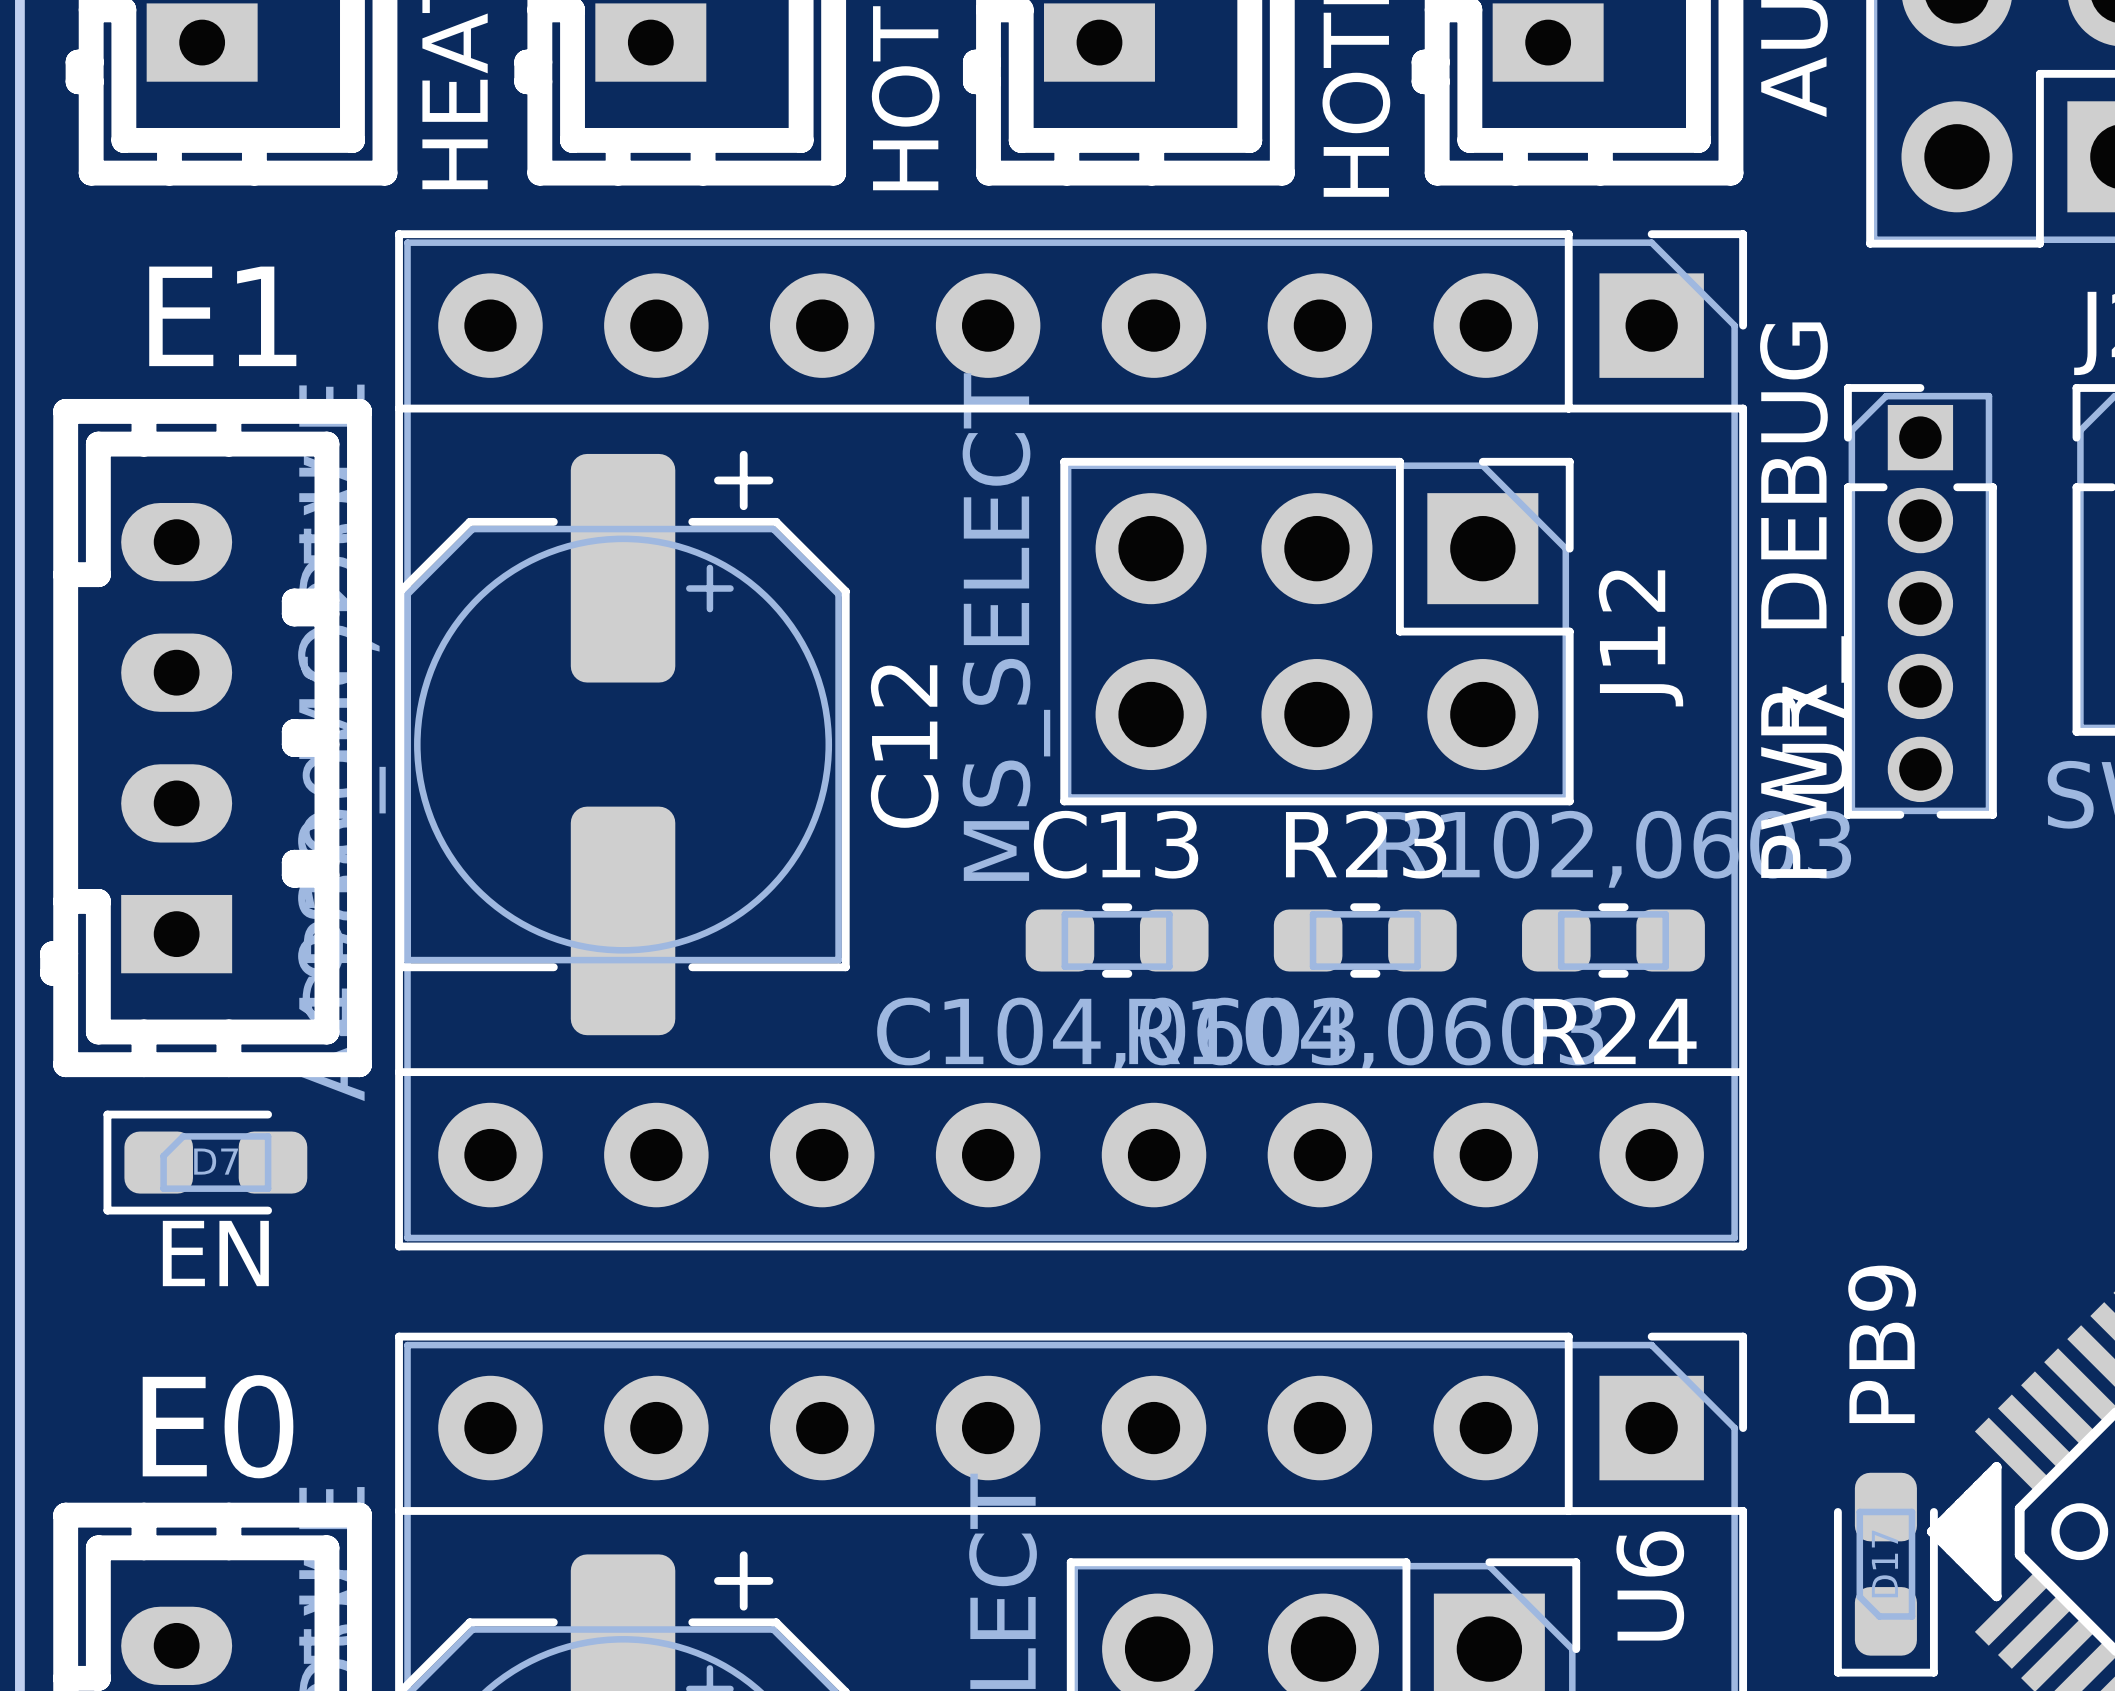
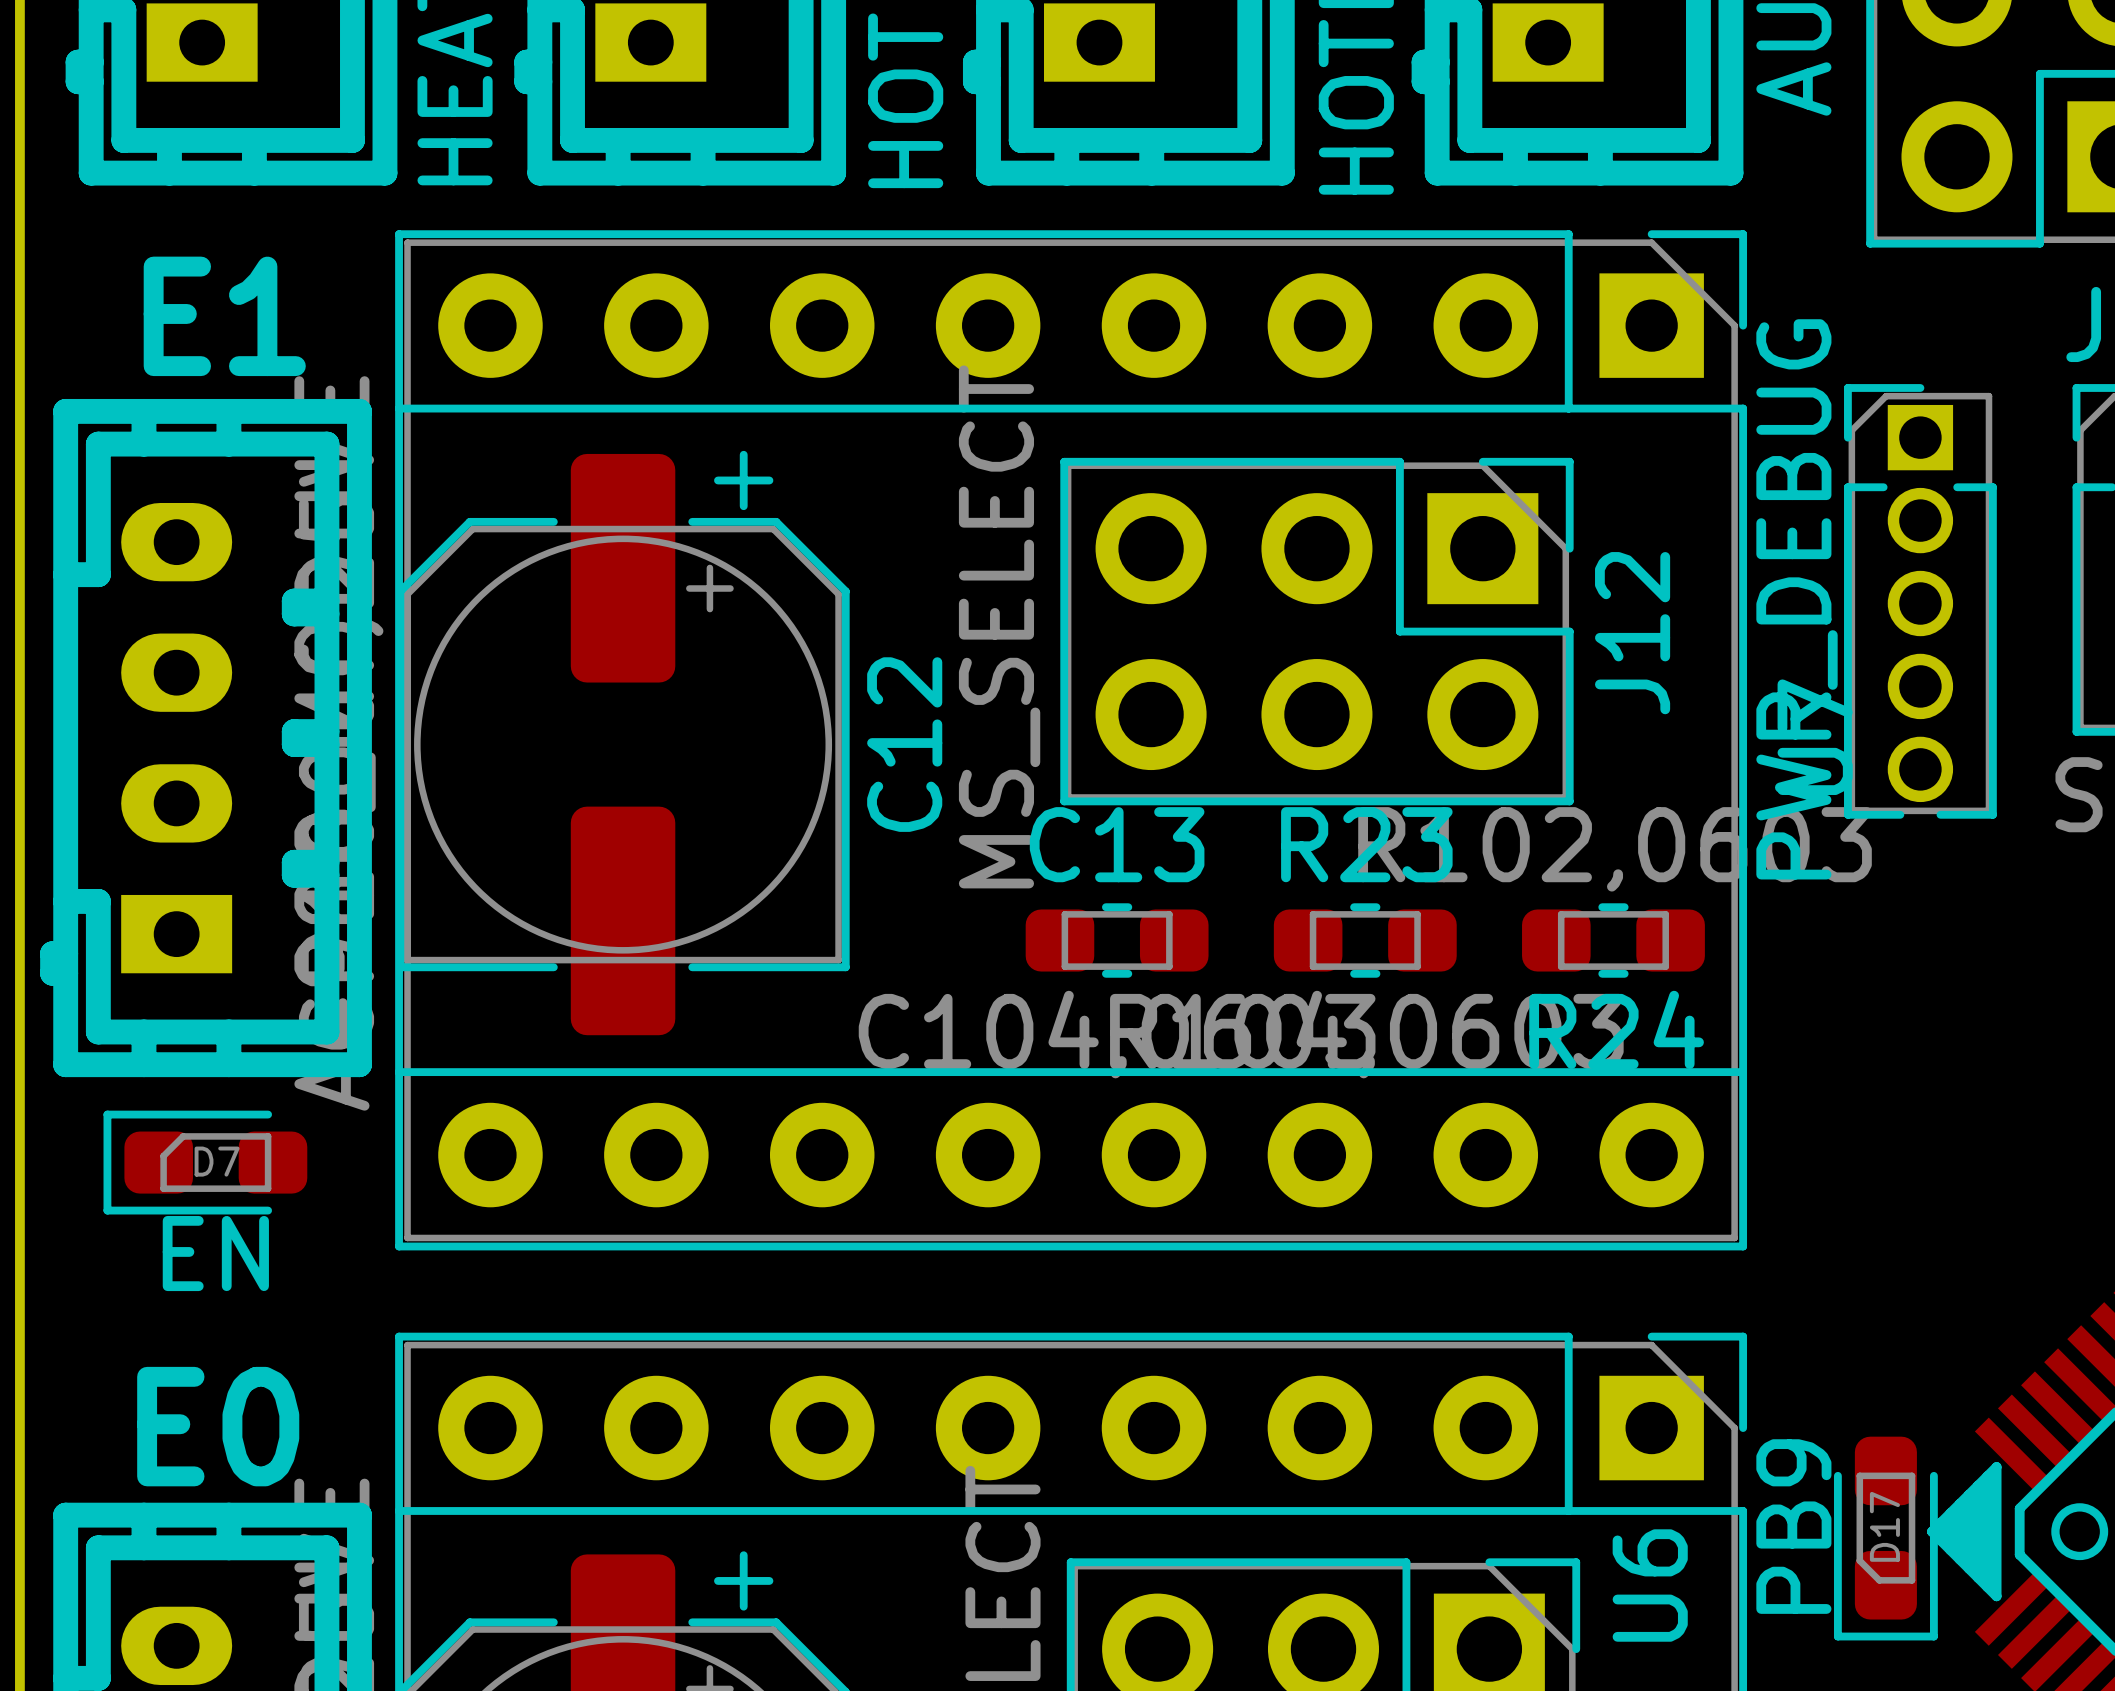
D17 value position: PB9 (1882, 1344) -> PB9 (1793, 1526)
D17 position: (1885, 1574) -> (1885, 1538)

